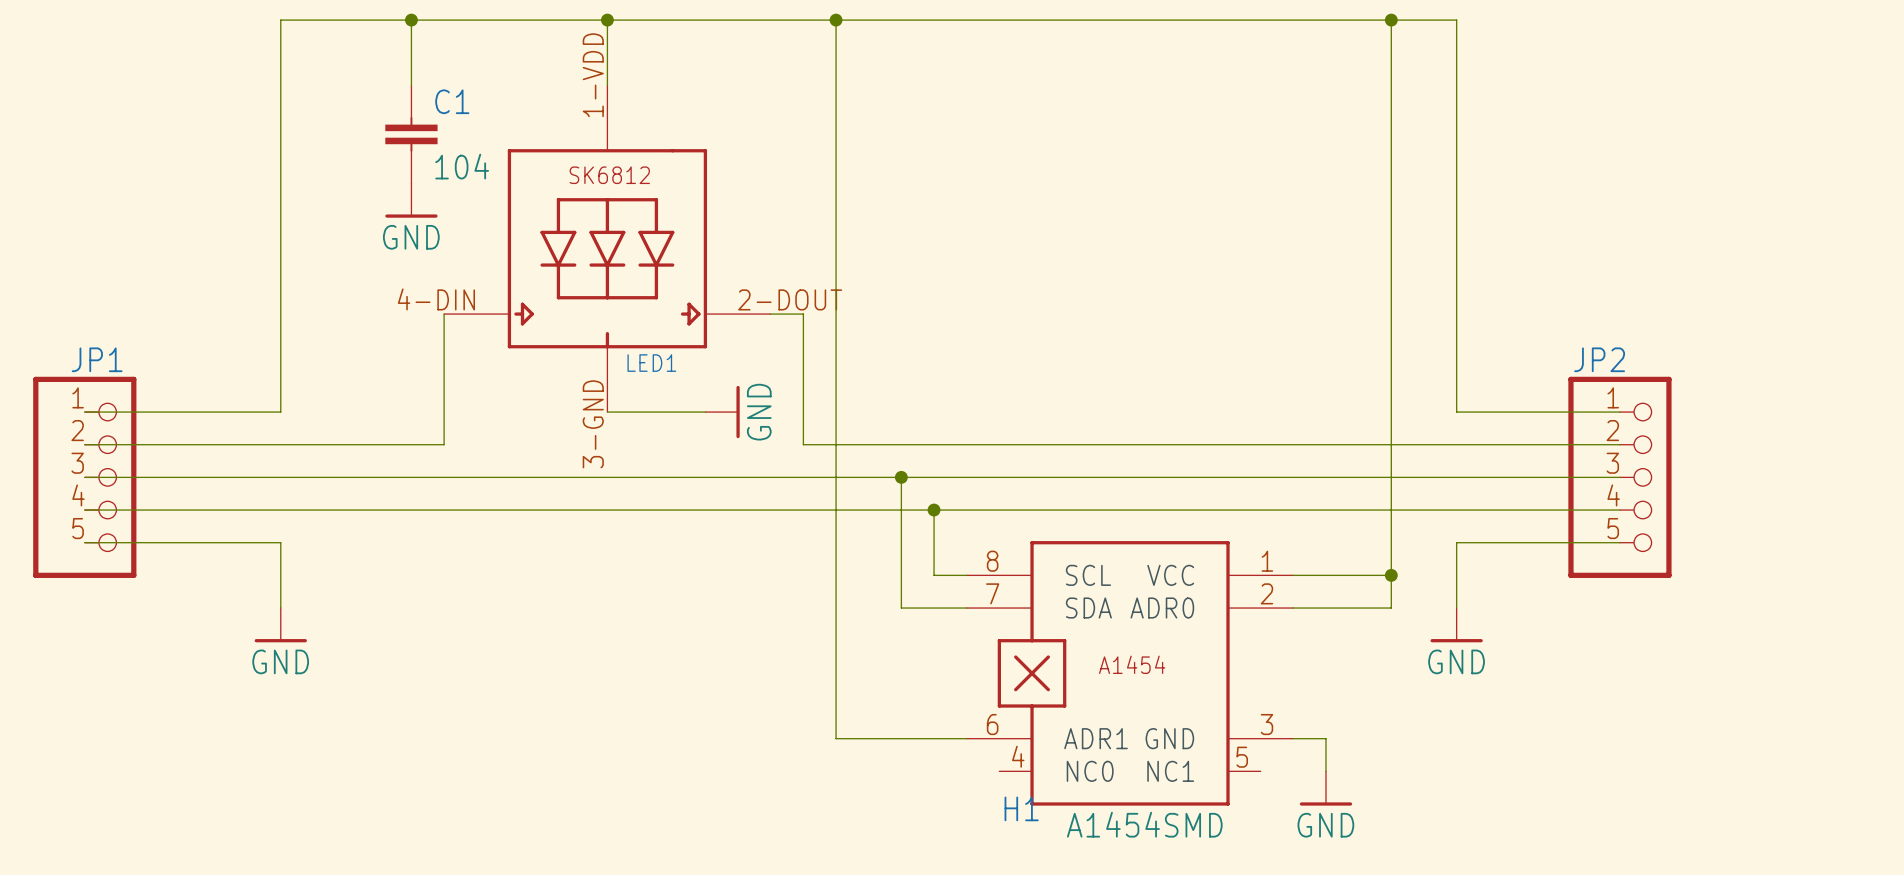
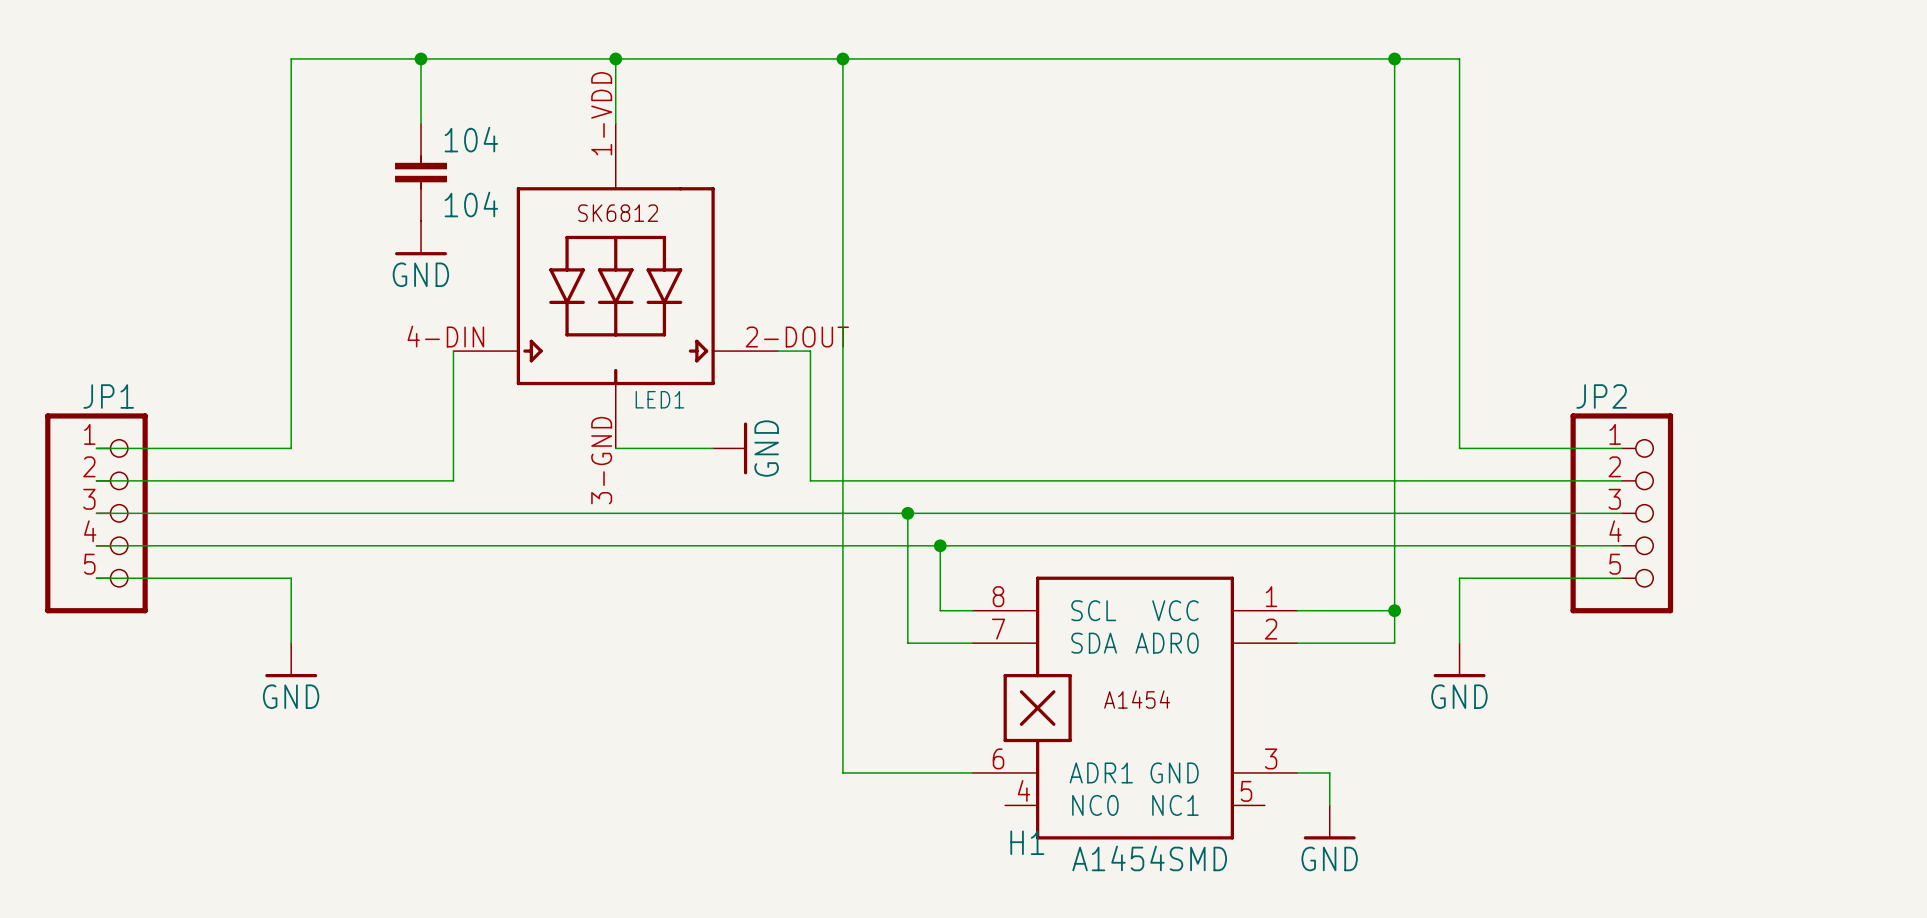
C1 name: C1 (452, 101) -> 104 (471, 139)

